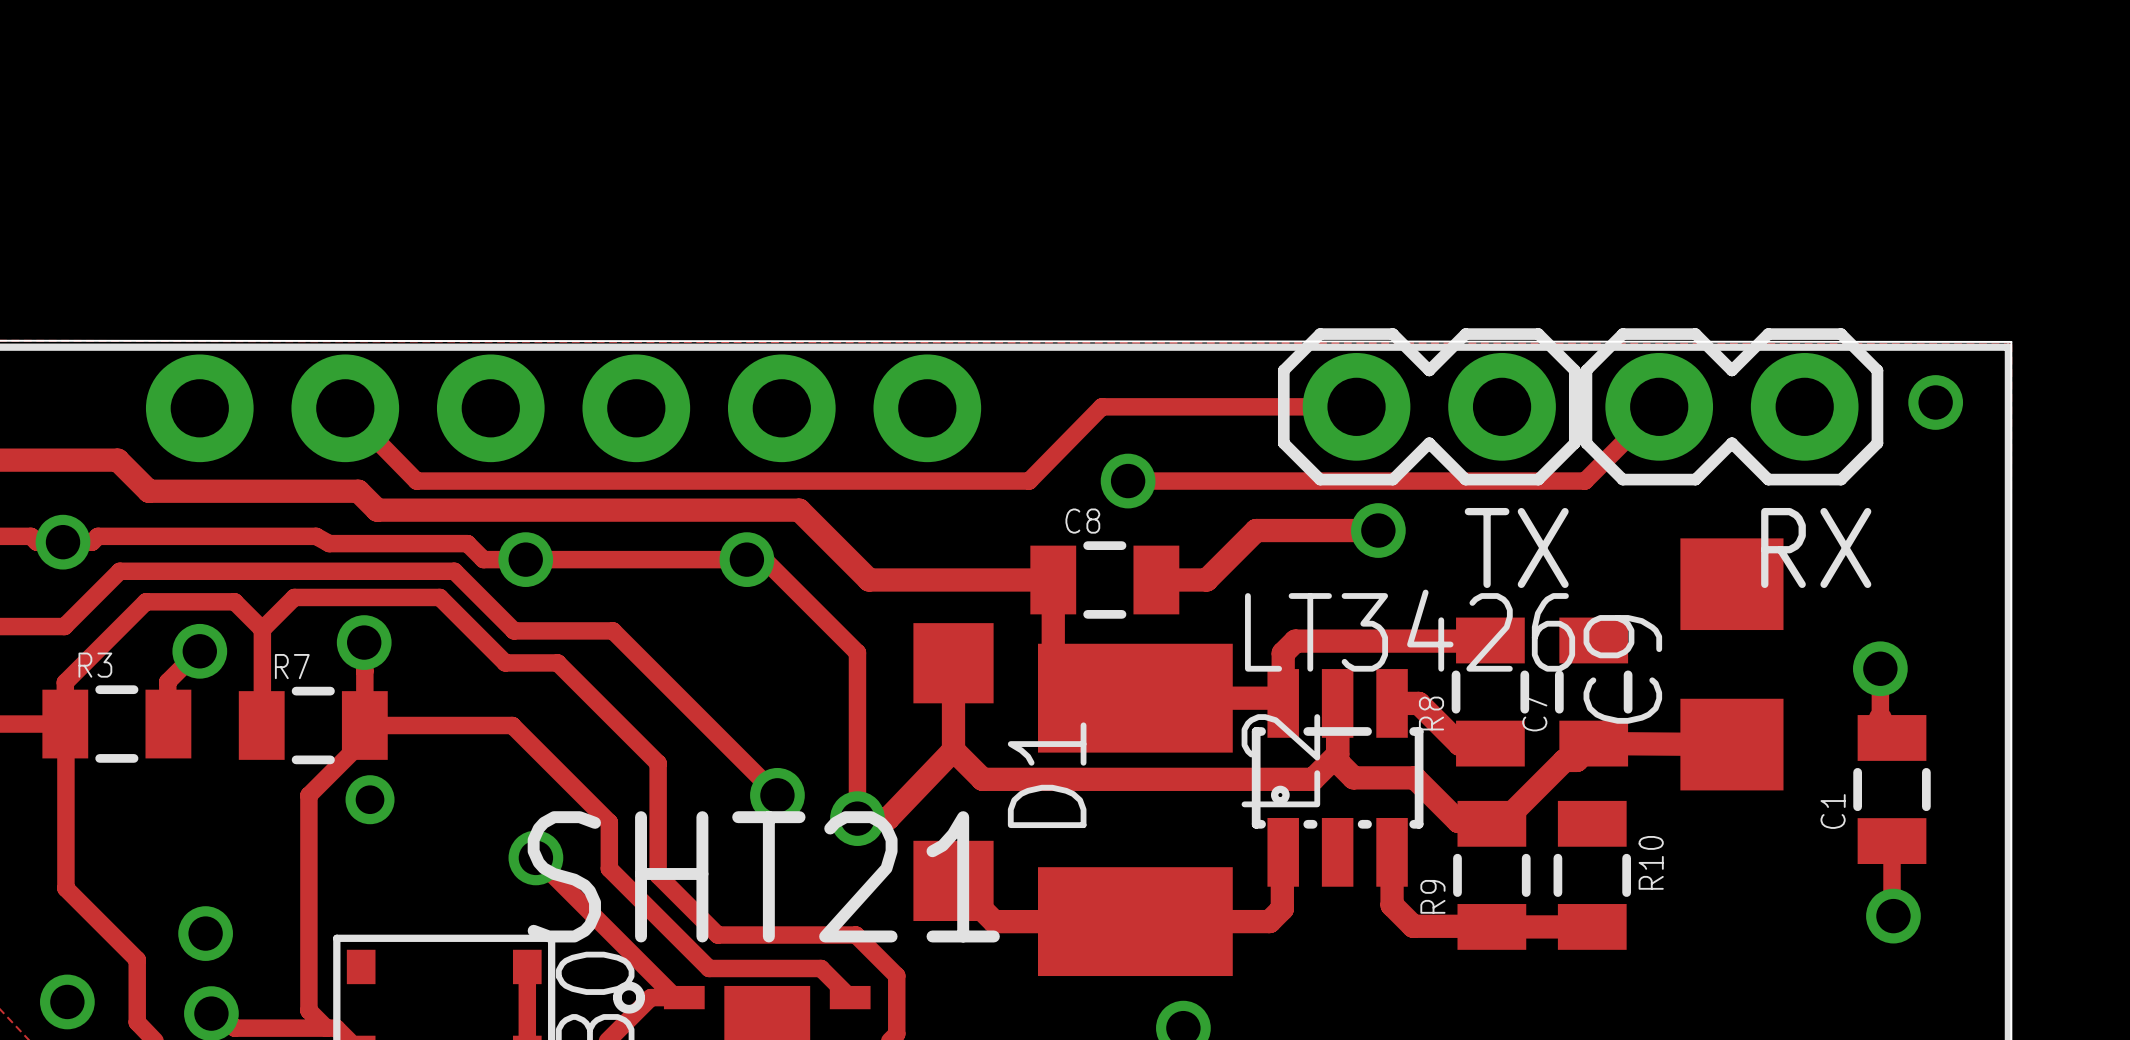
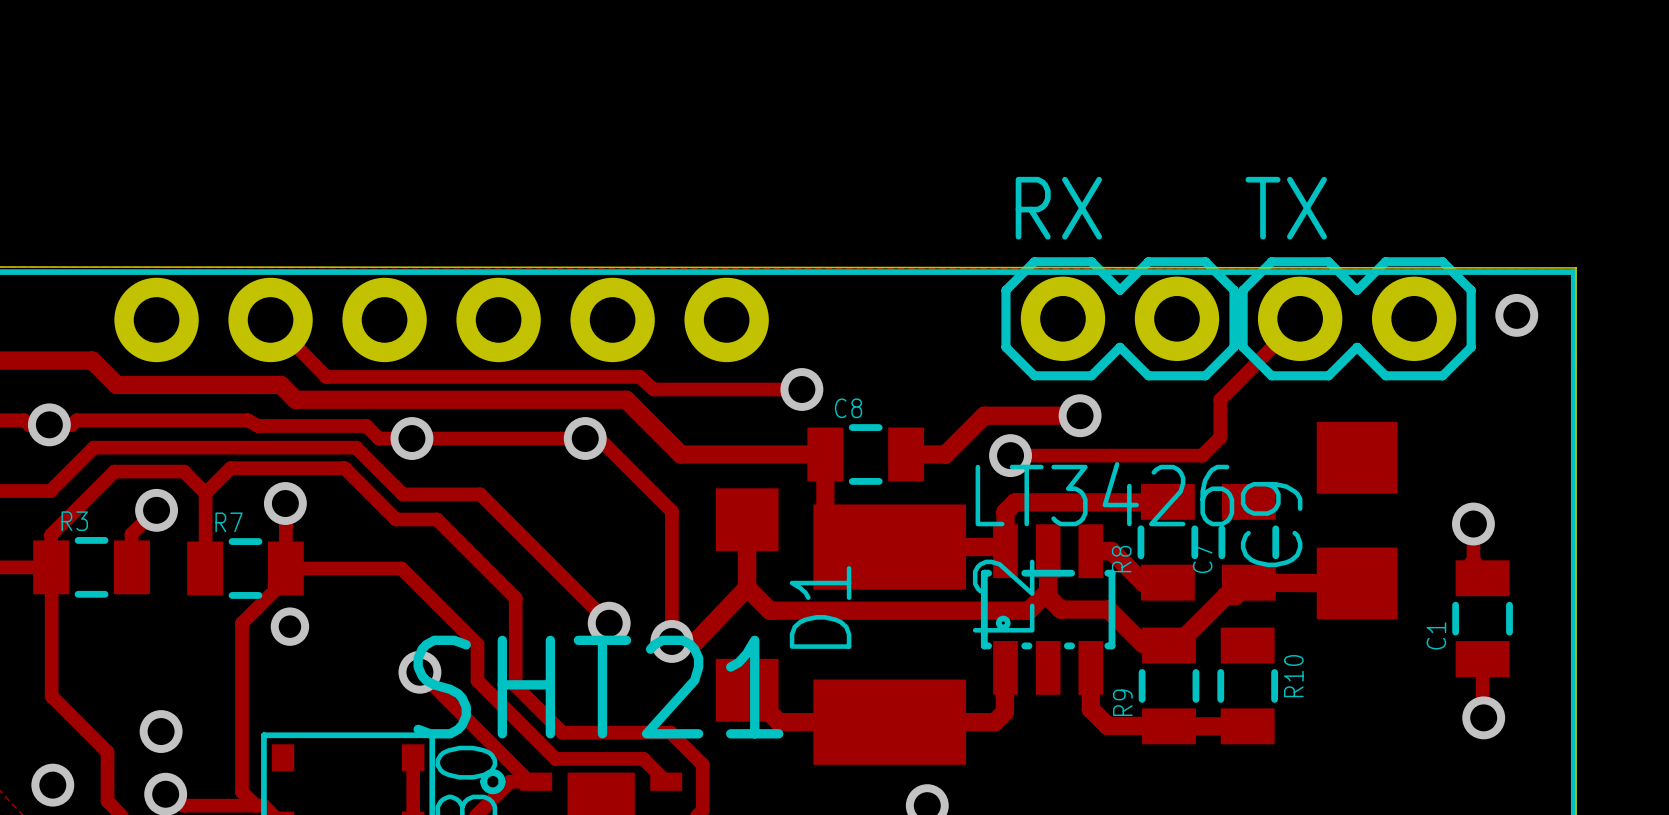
track: (1356, 406) (1101, 406) (1029, 481) (816, 481) -> (801, 389) (653, 389) (639, 376)
track: (1659, 406) (1584, 481) (1128, 481) -> (1301, 317) (1220, 399) (1220, 437) (1202, 455) (1010, 455)
via: (1128, 481) -> none
via: none -> (801, 389)
TX name: TX (1516, 547) -> RX (1058, 208)
RX name: RX (1816, 547) -> TX (1286, 208)
via: none -> (1010, 455)

